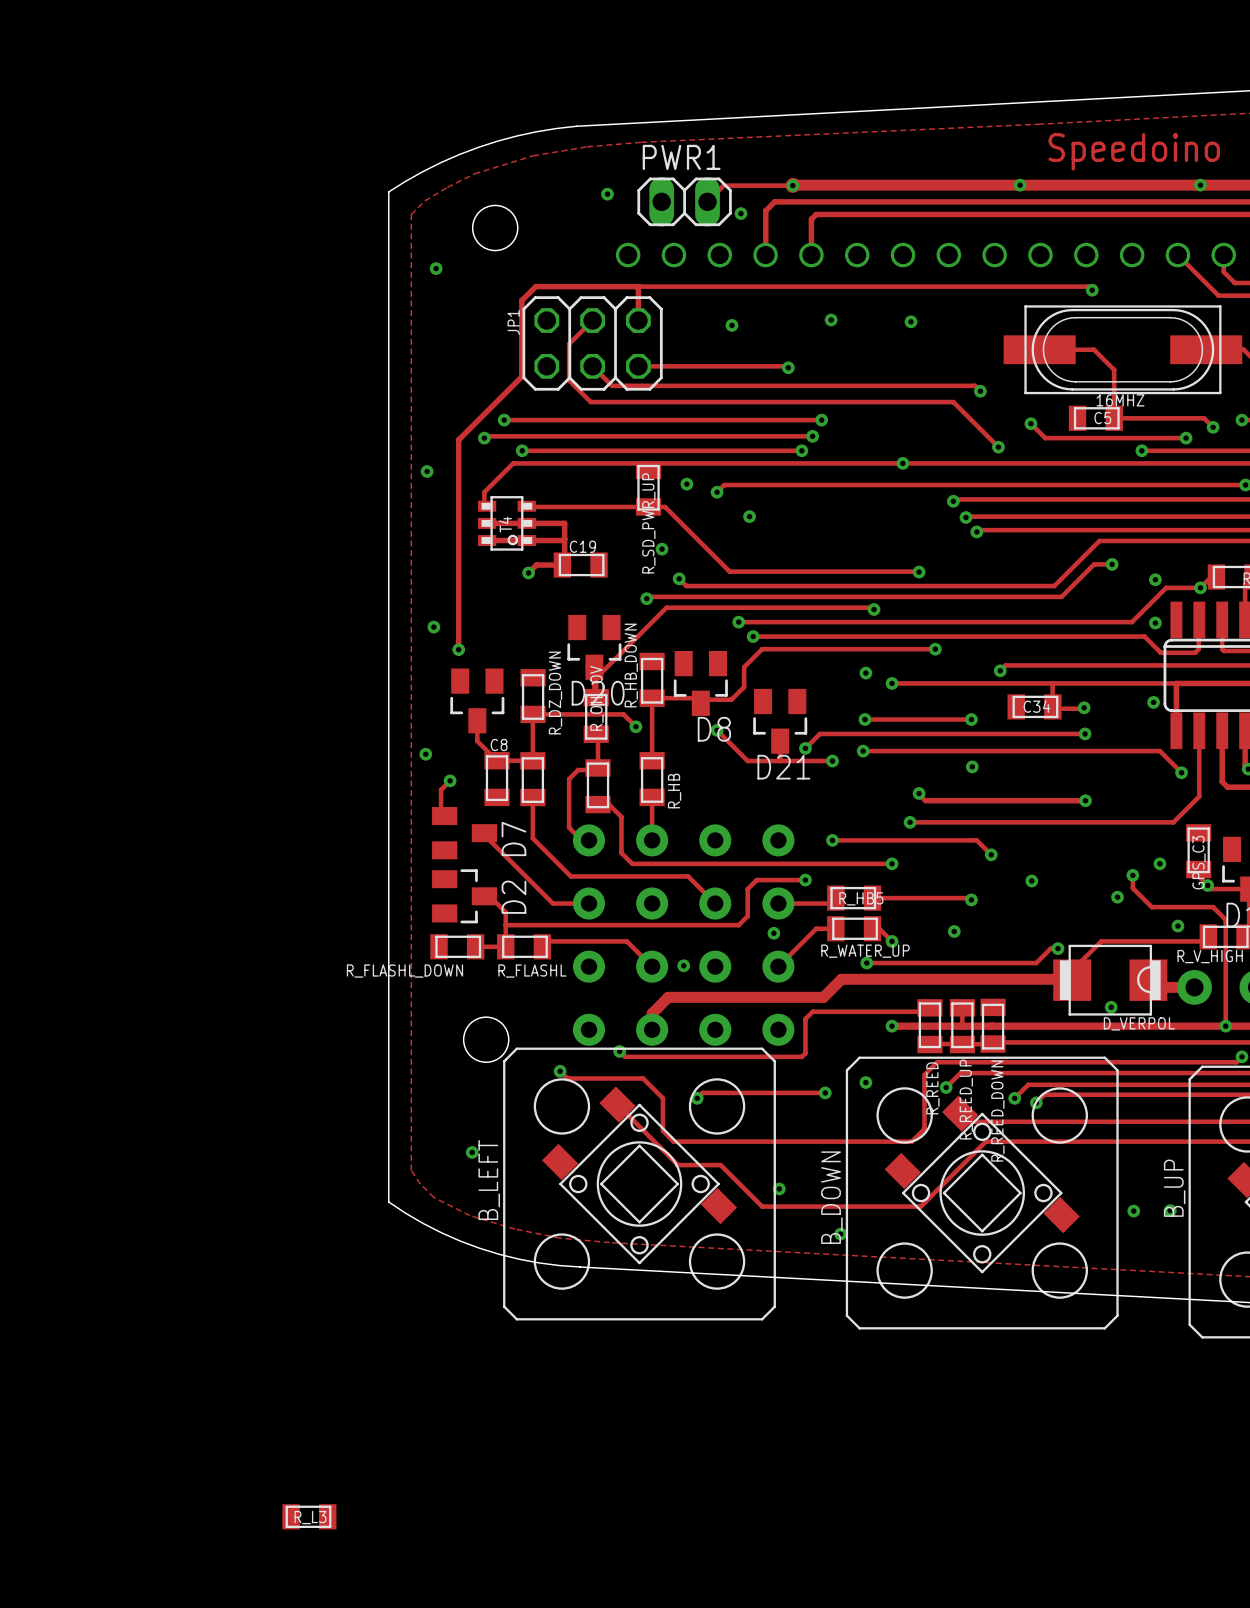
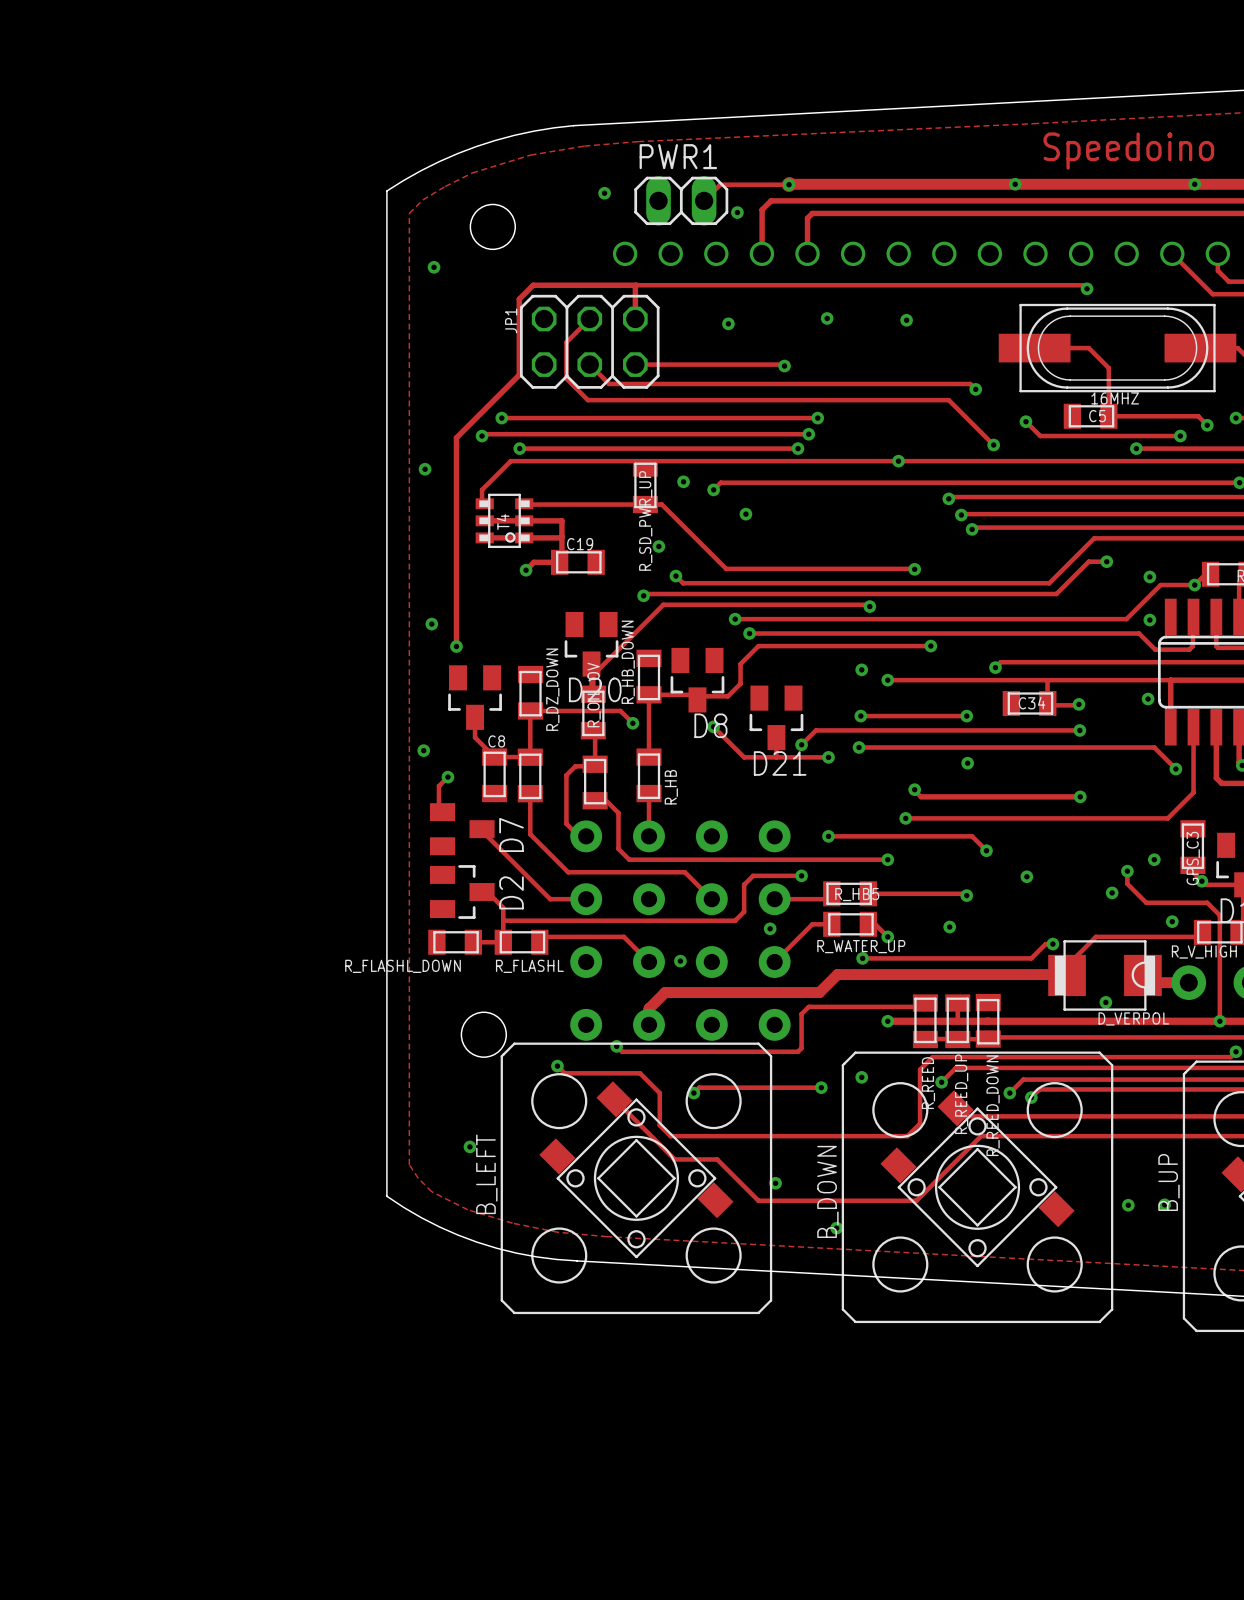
R_L3: (309, 1516) -> none

